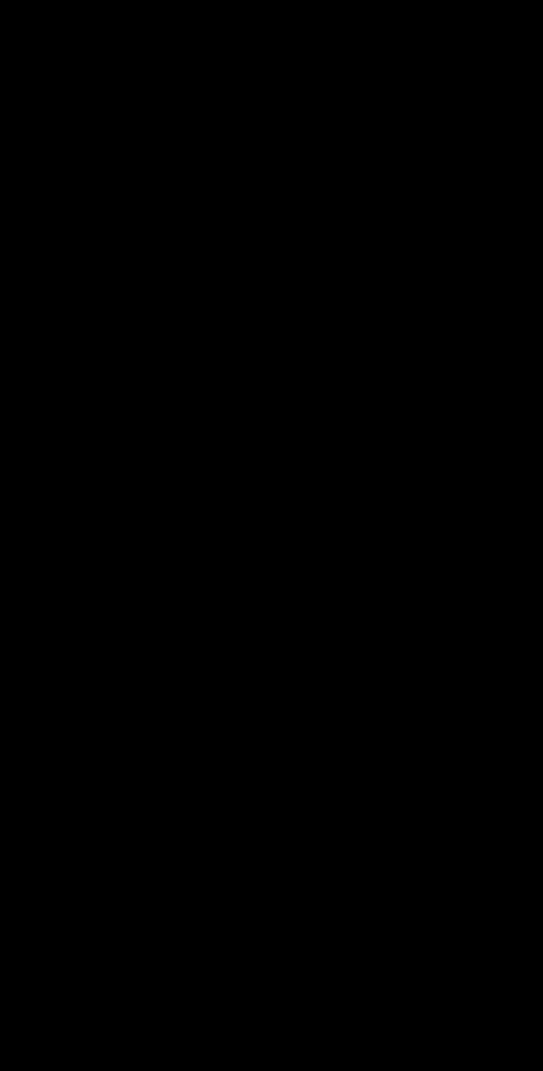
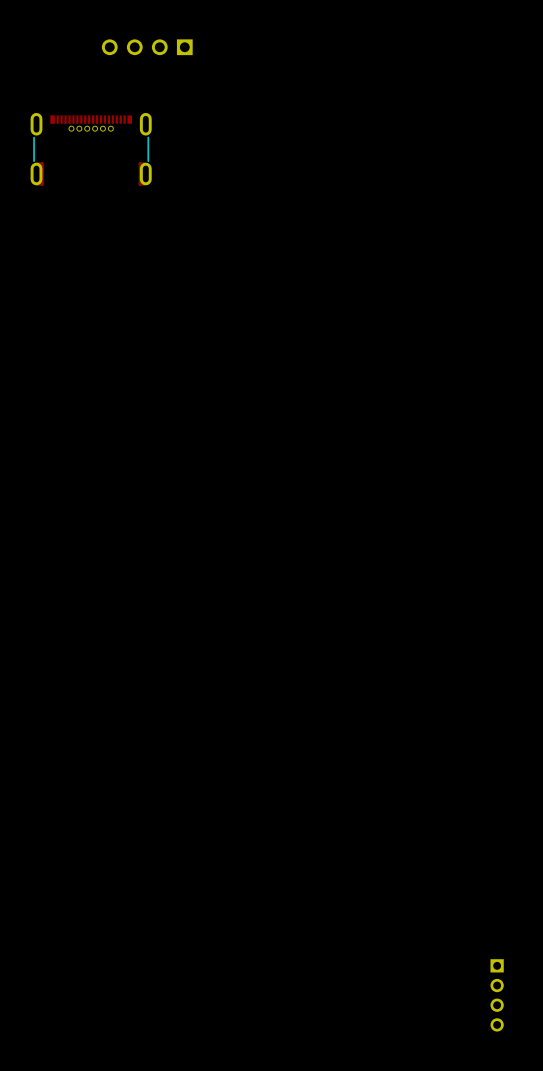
part: none -> (147, 47)
part: none -> (91, 149)
part: none -> (497, 995)

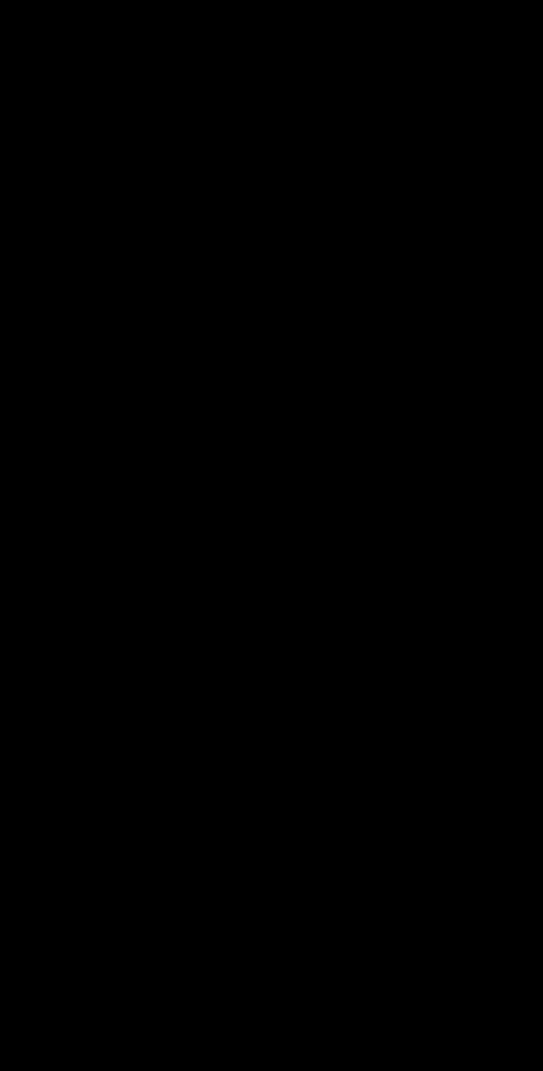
part: (147, 47) -> none
part: (91, 149) -> none
part: (497, 995) -> none

